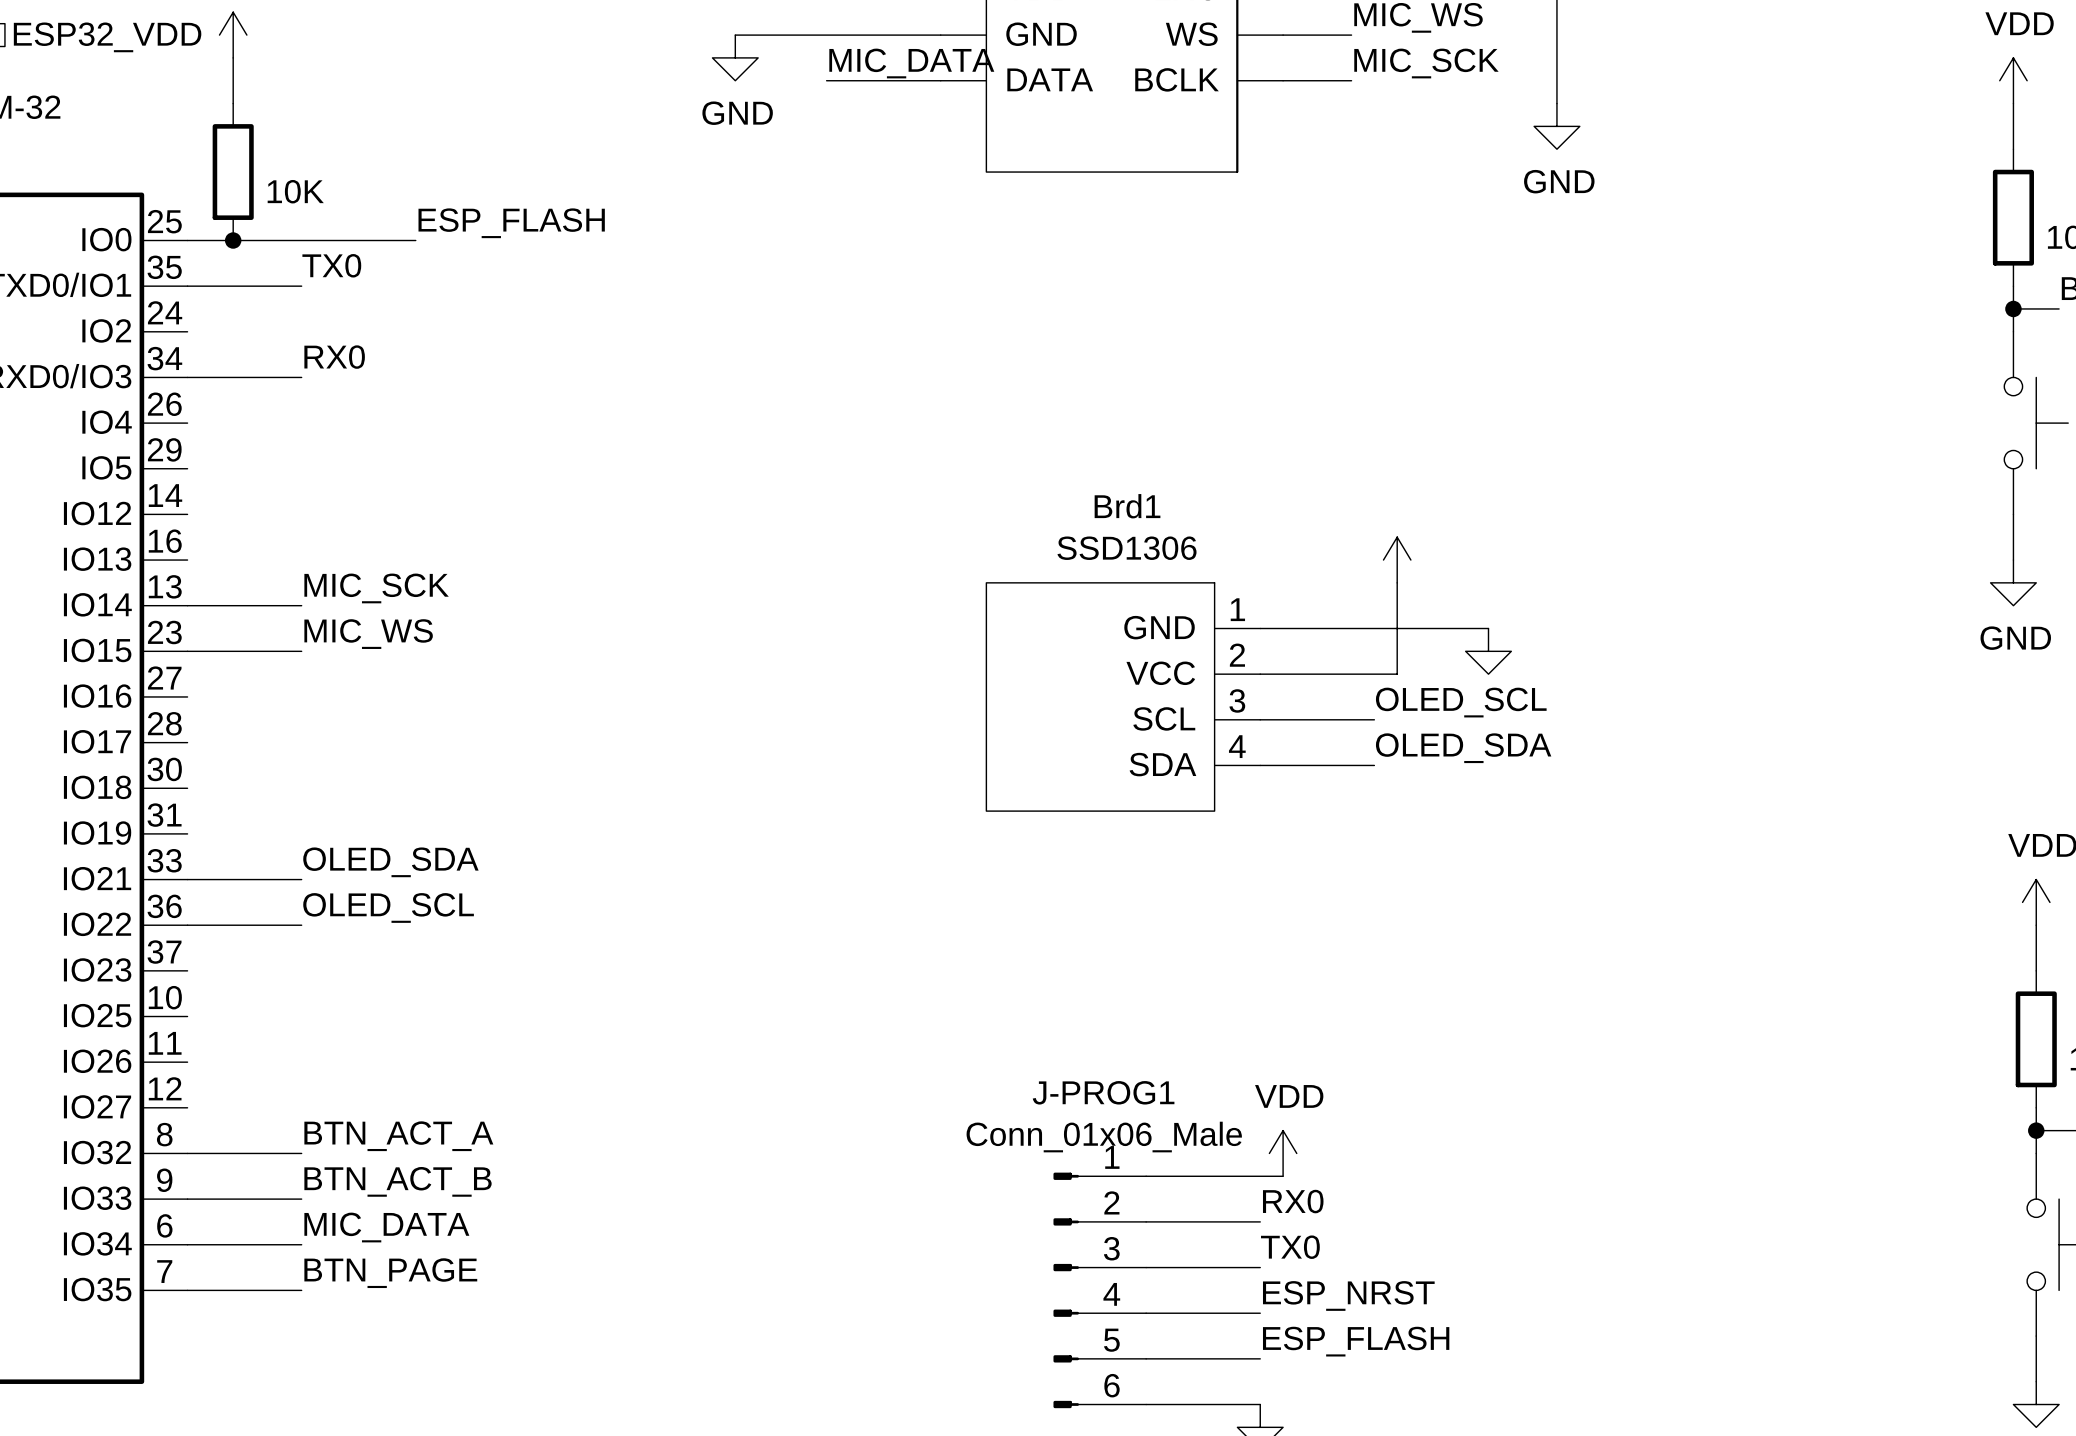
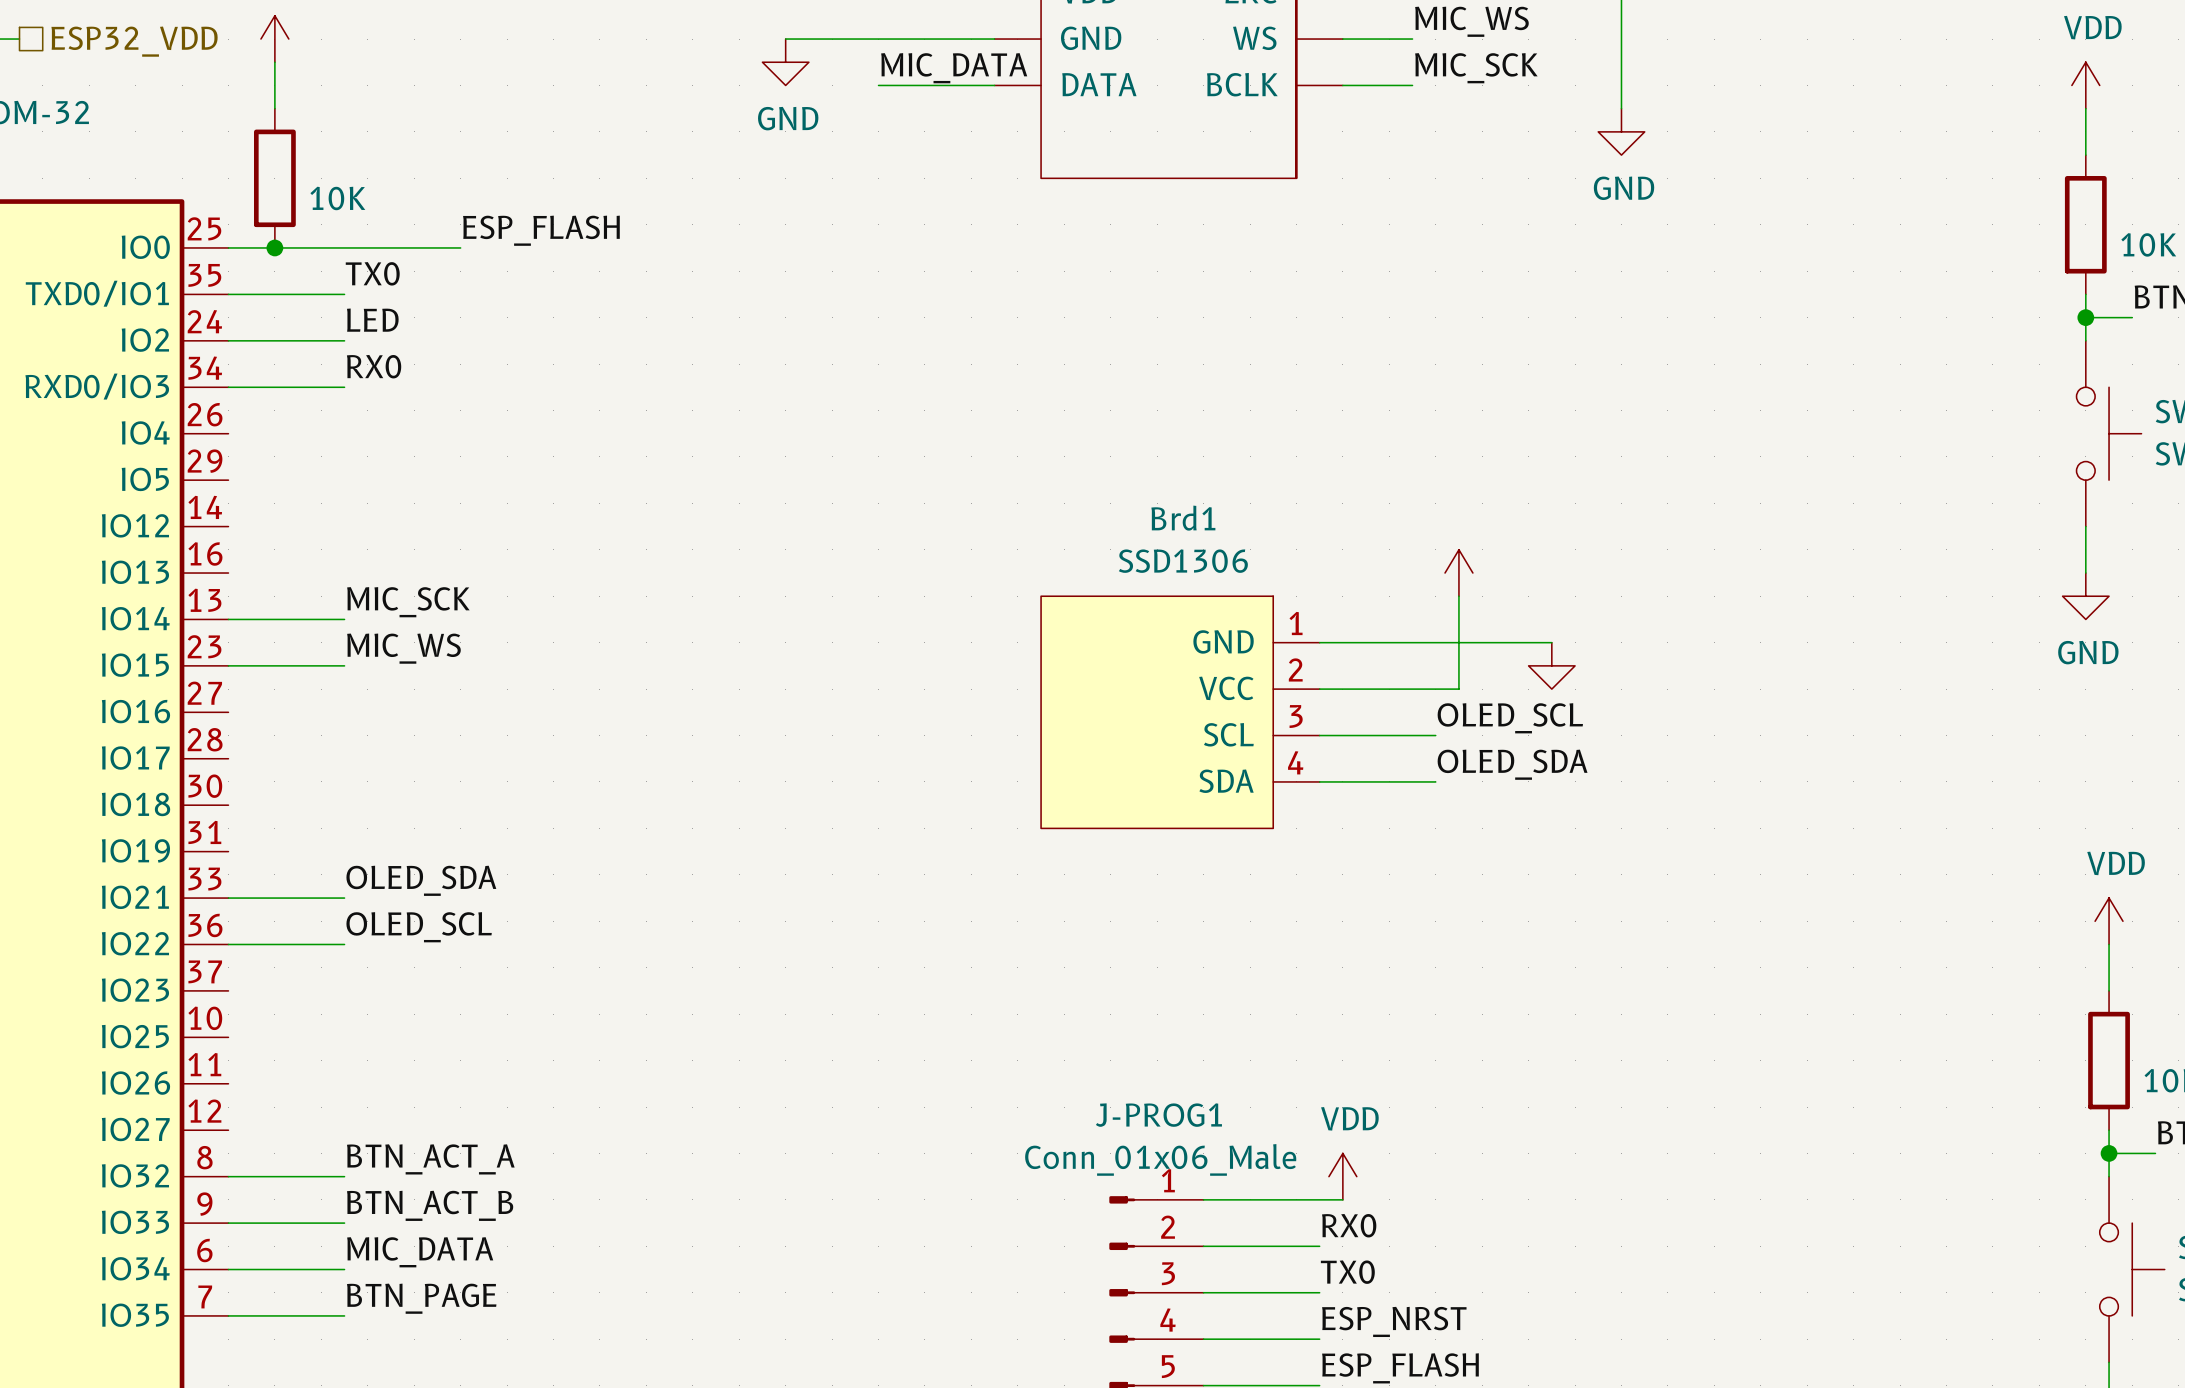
label: none -> LED (372, 320)
wire: none -> (228, 340) (344, 340)

